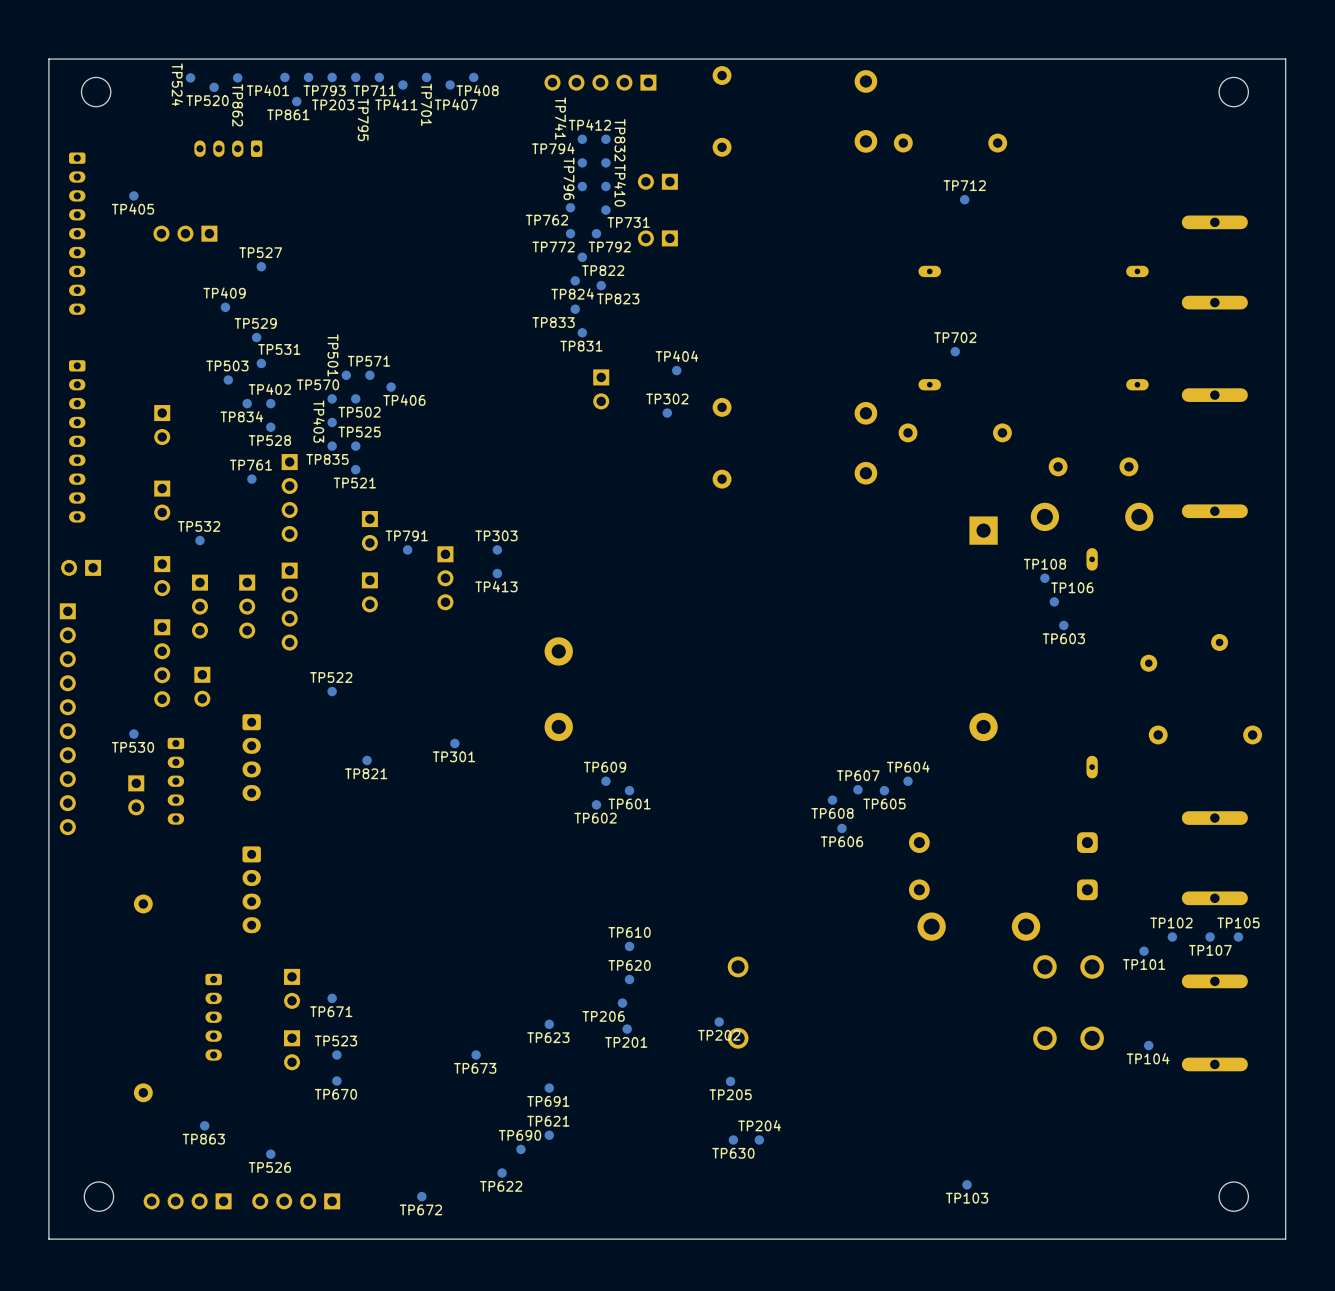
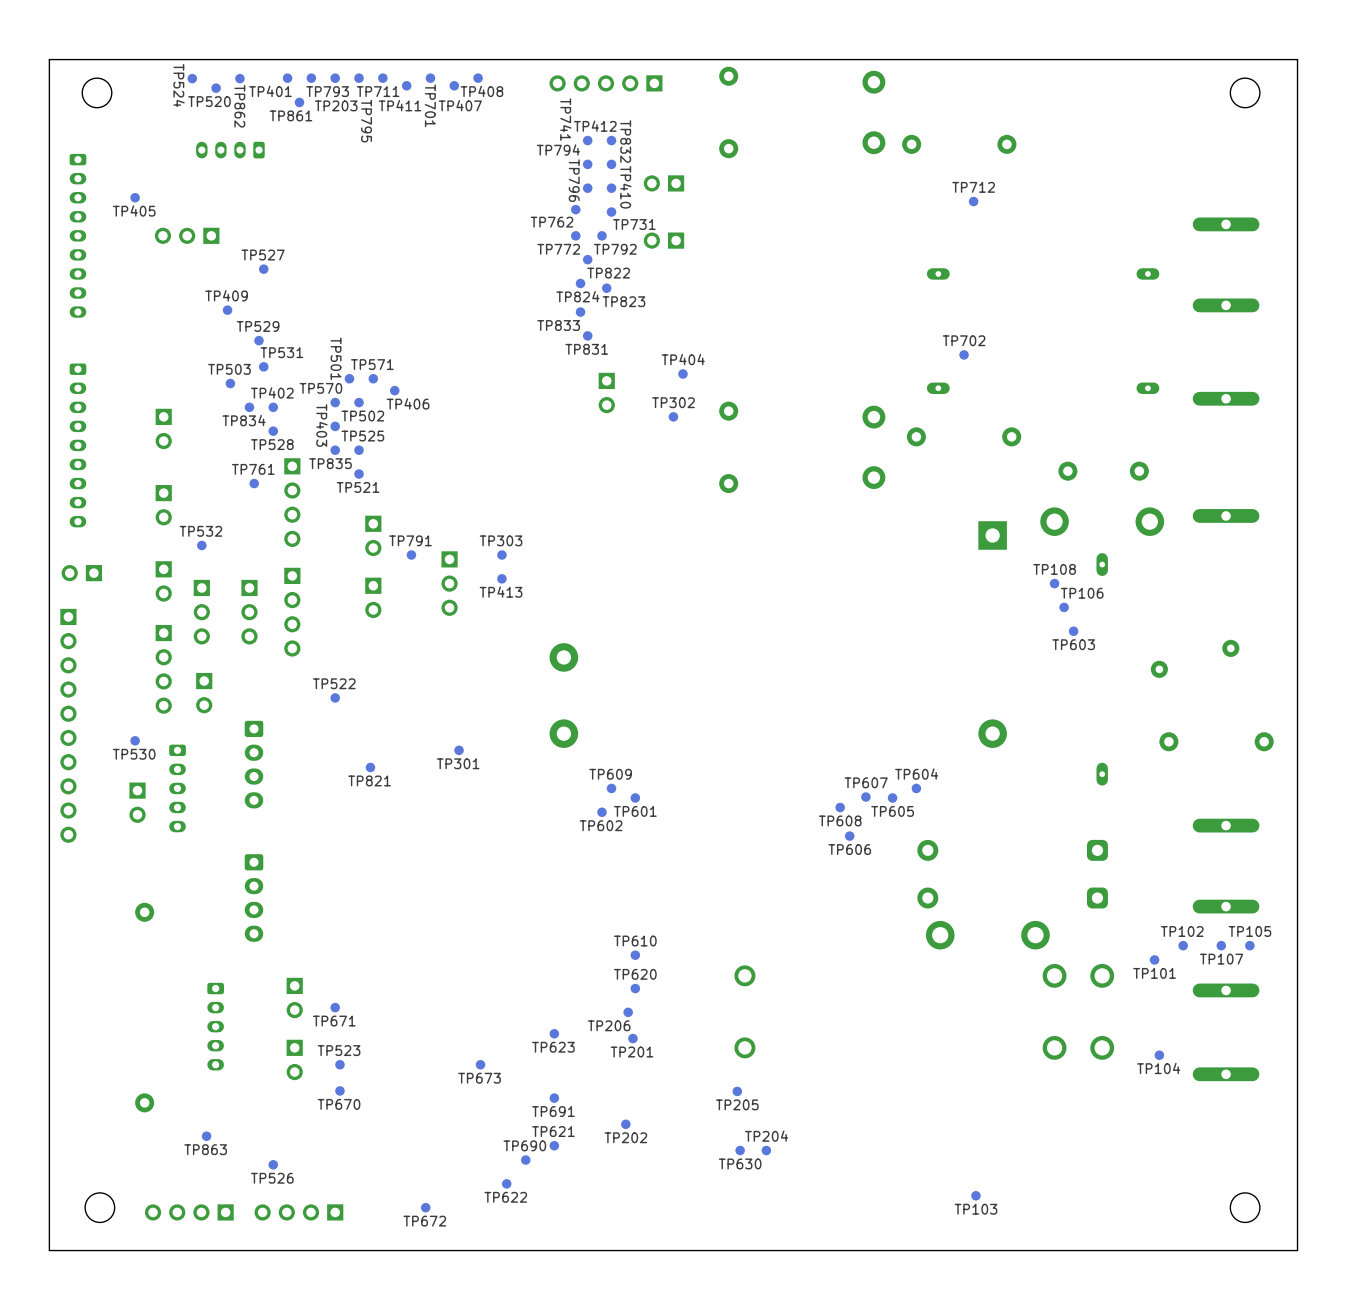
TP202 position: (719, 1021) -> (625, 1124)

